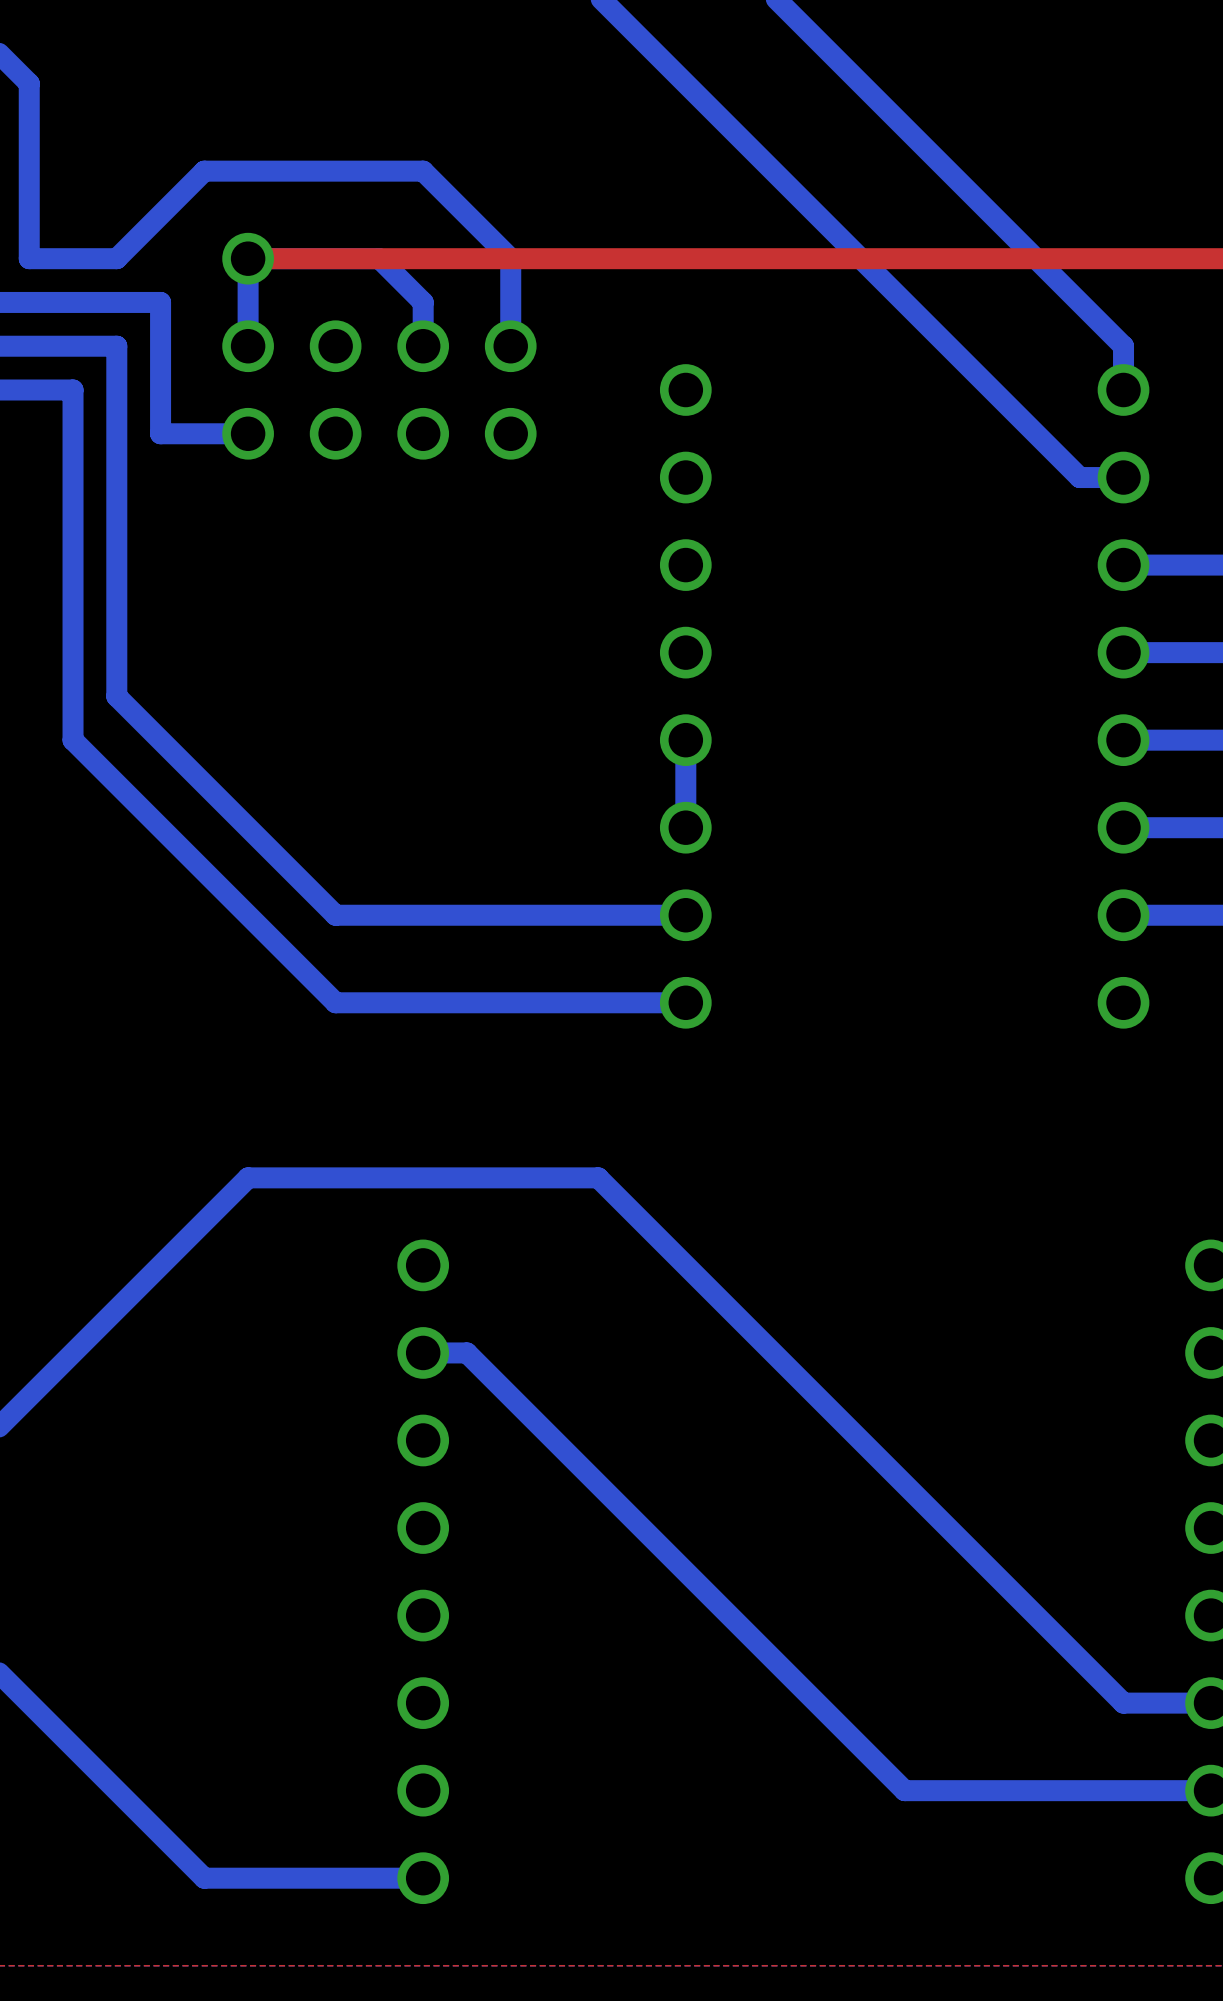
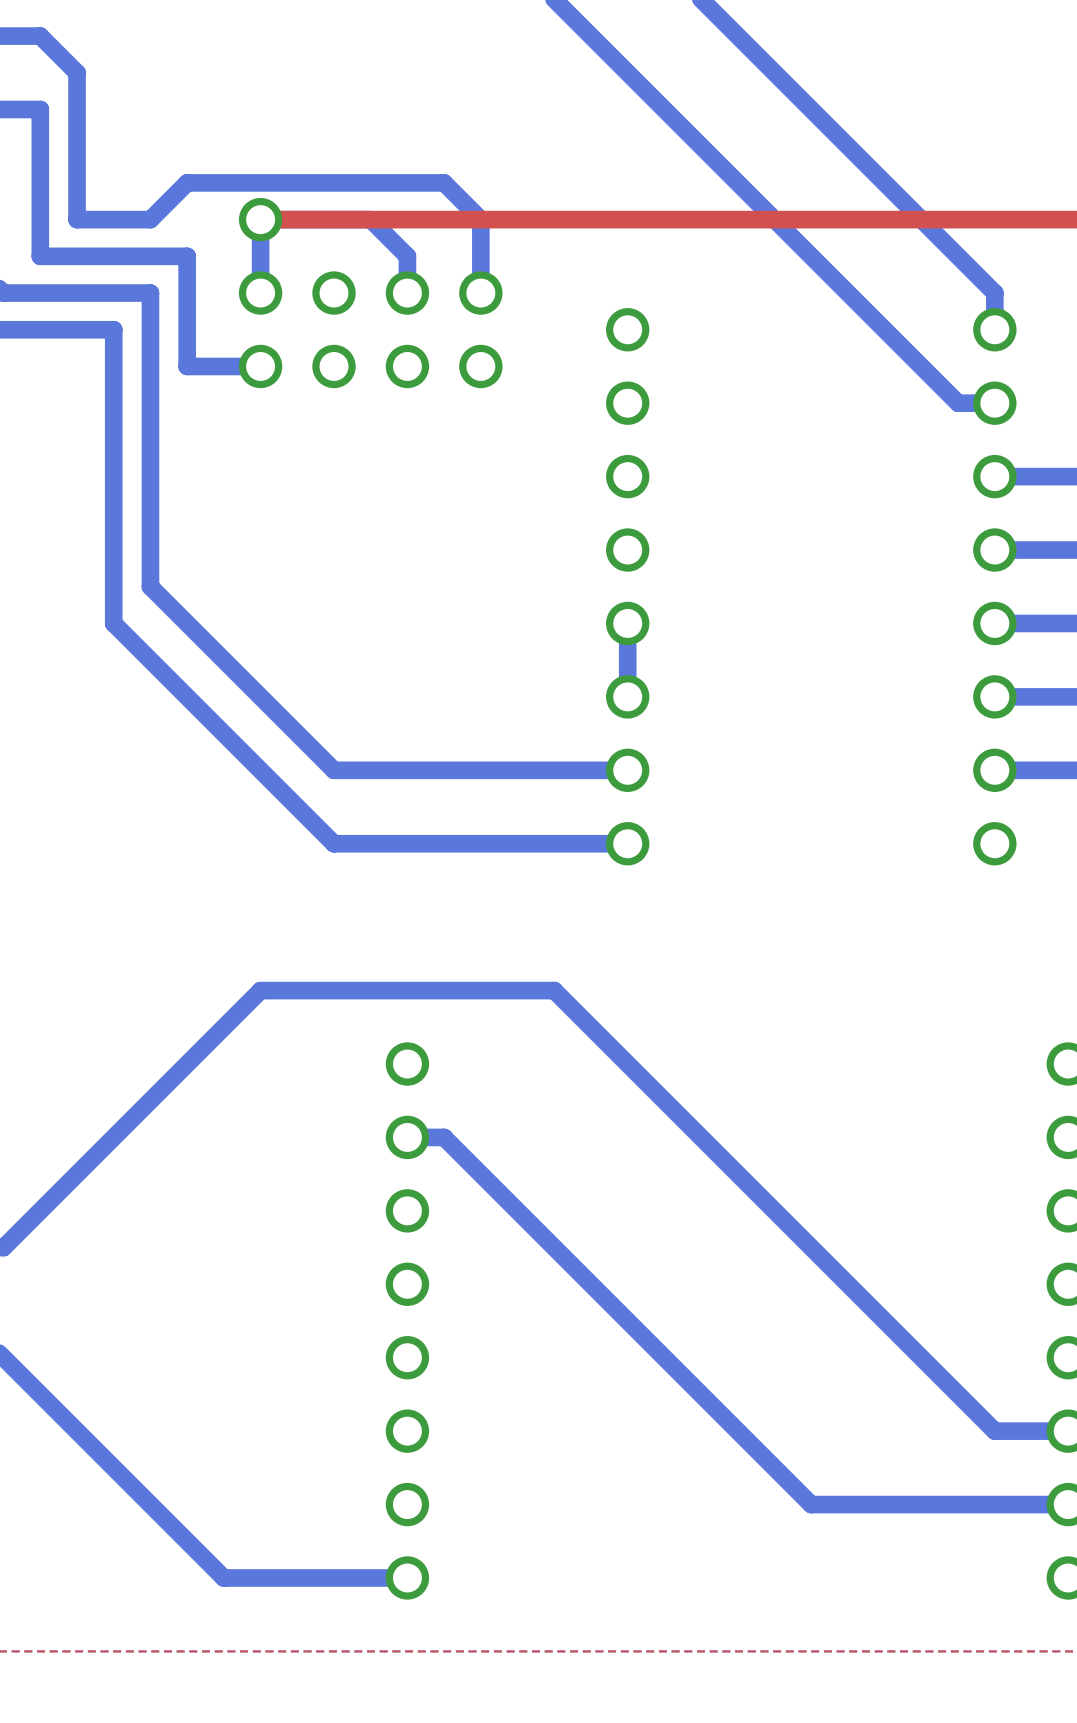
bottom track: (160, 214) (204, 171) (423, 171) (466, 214) -> (187, 182) (444, 182)

